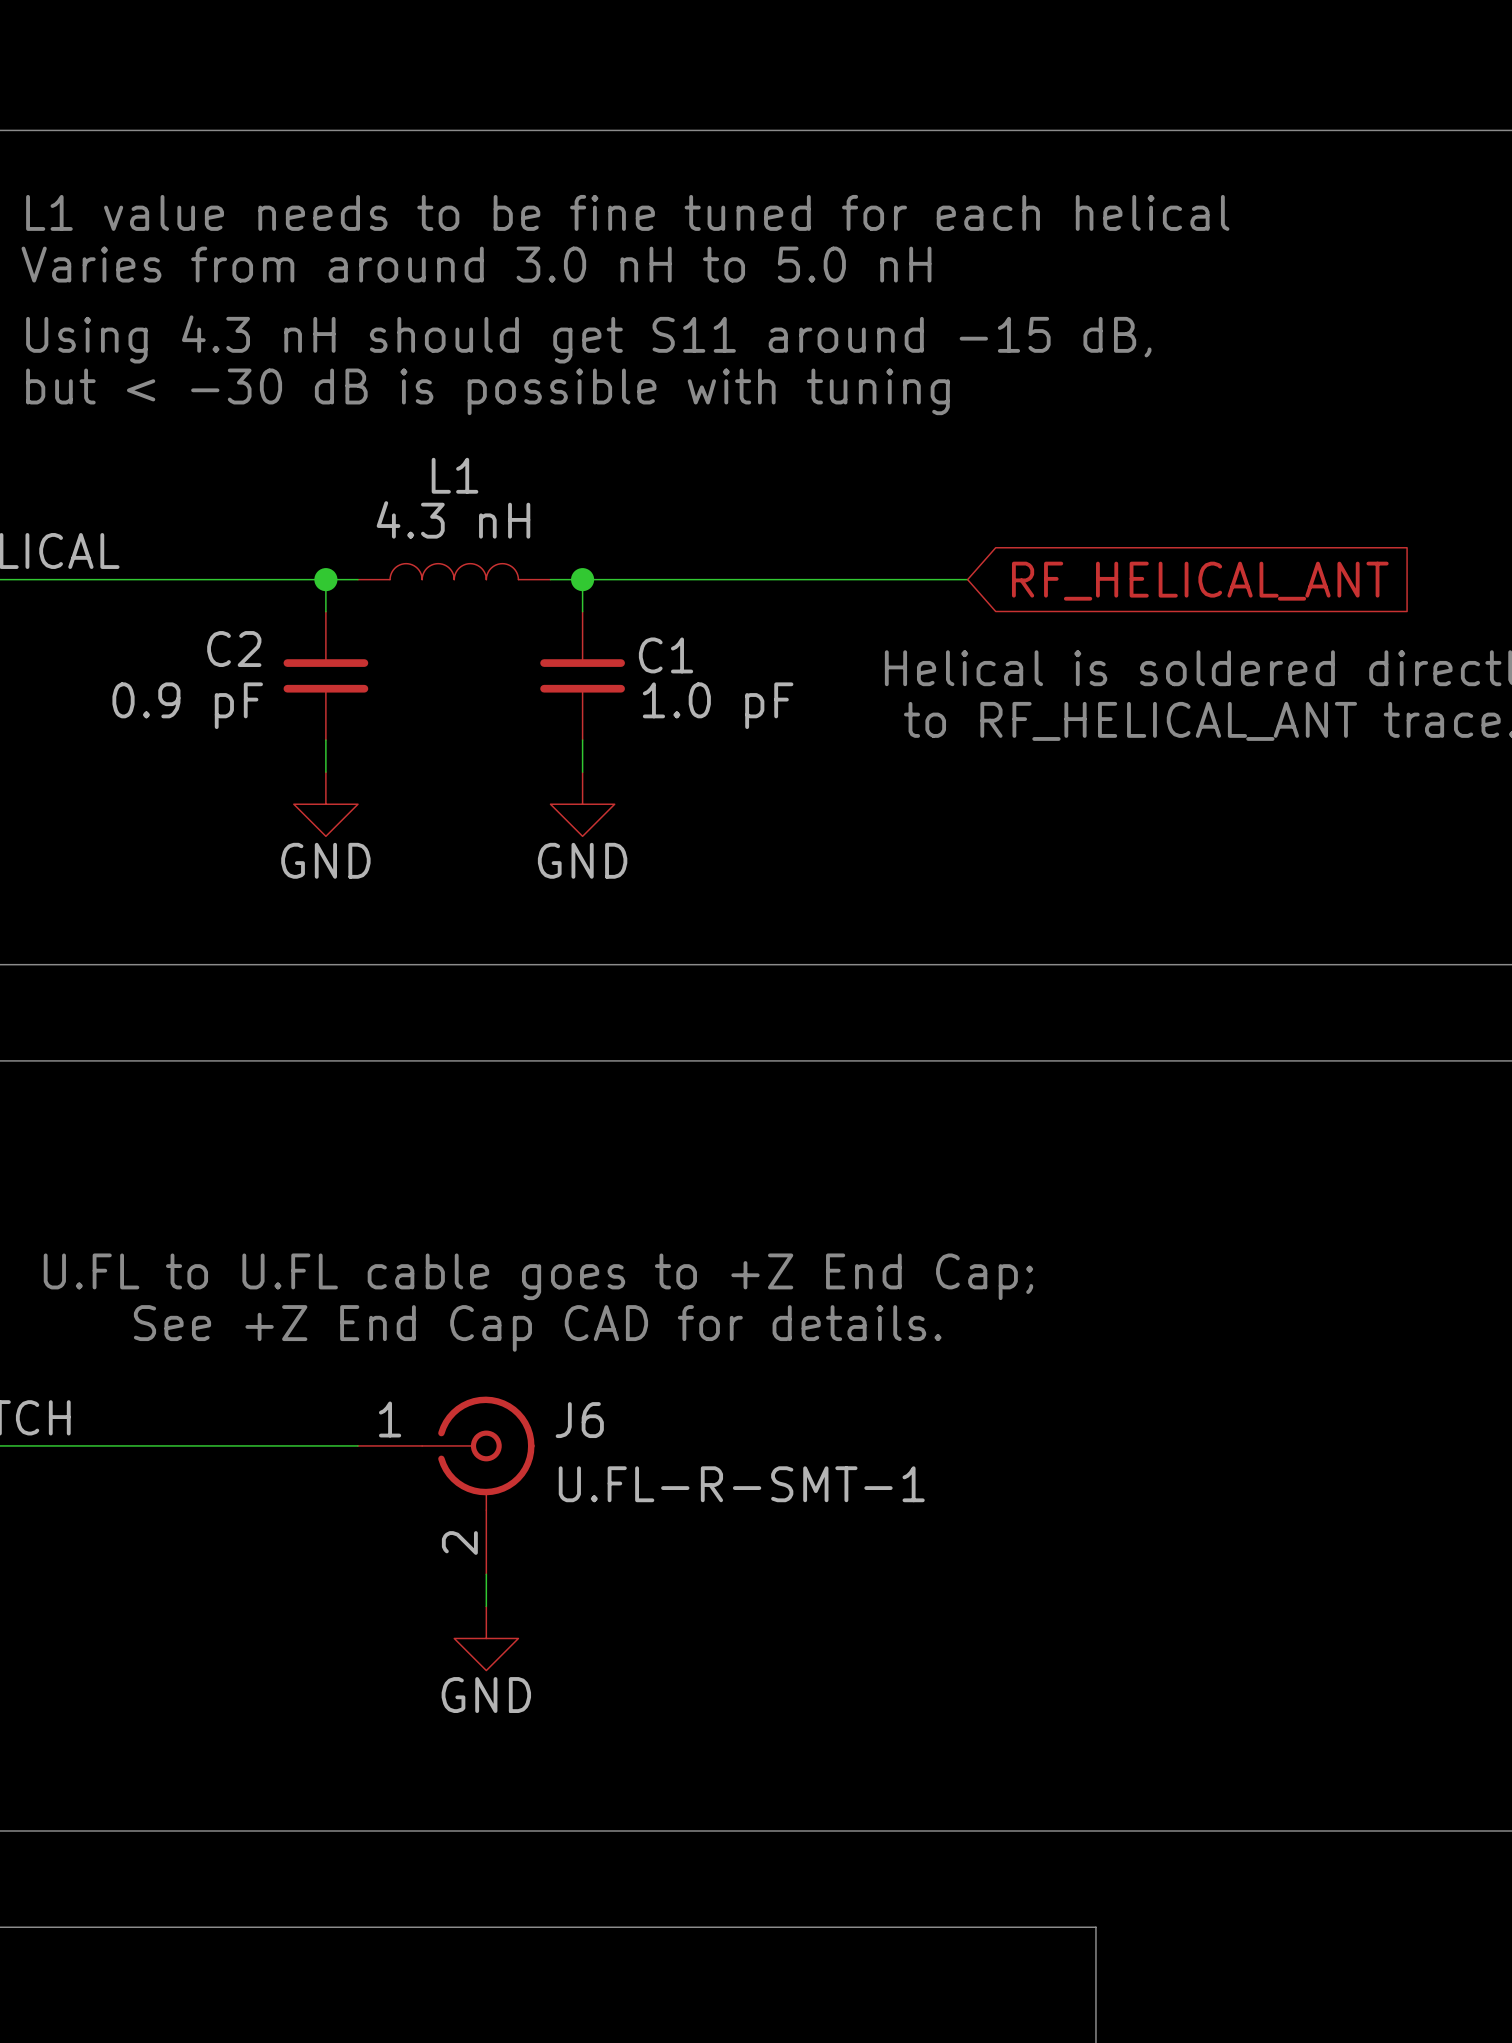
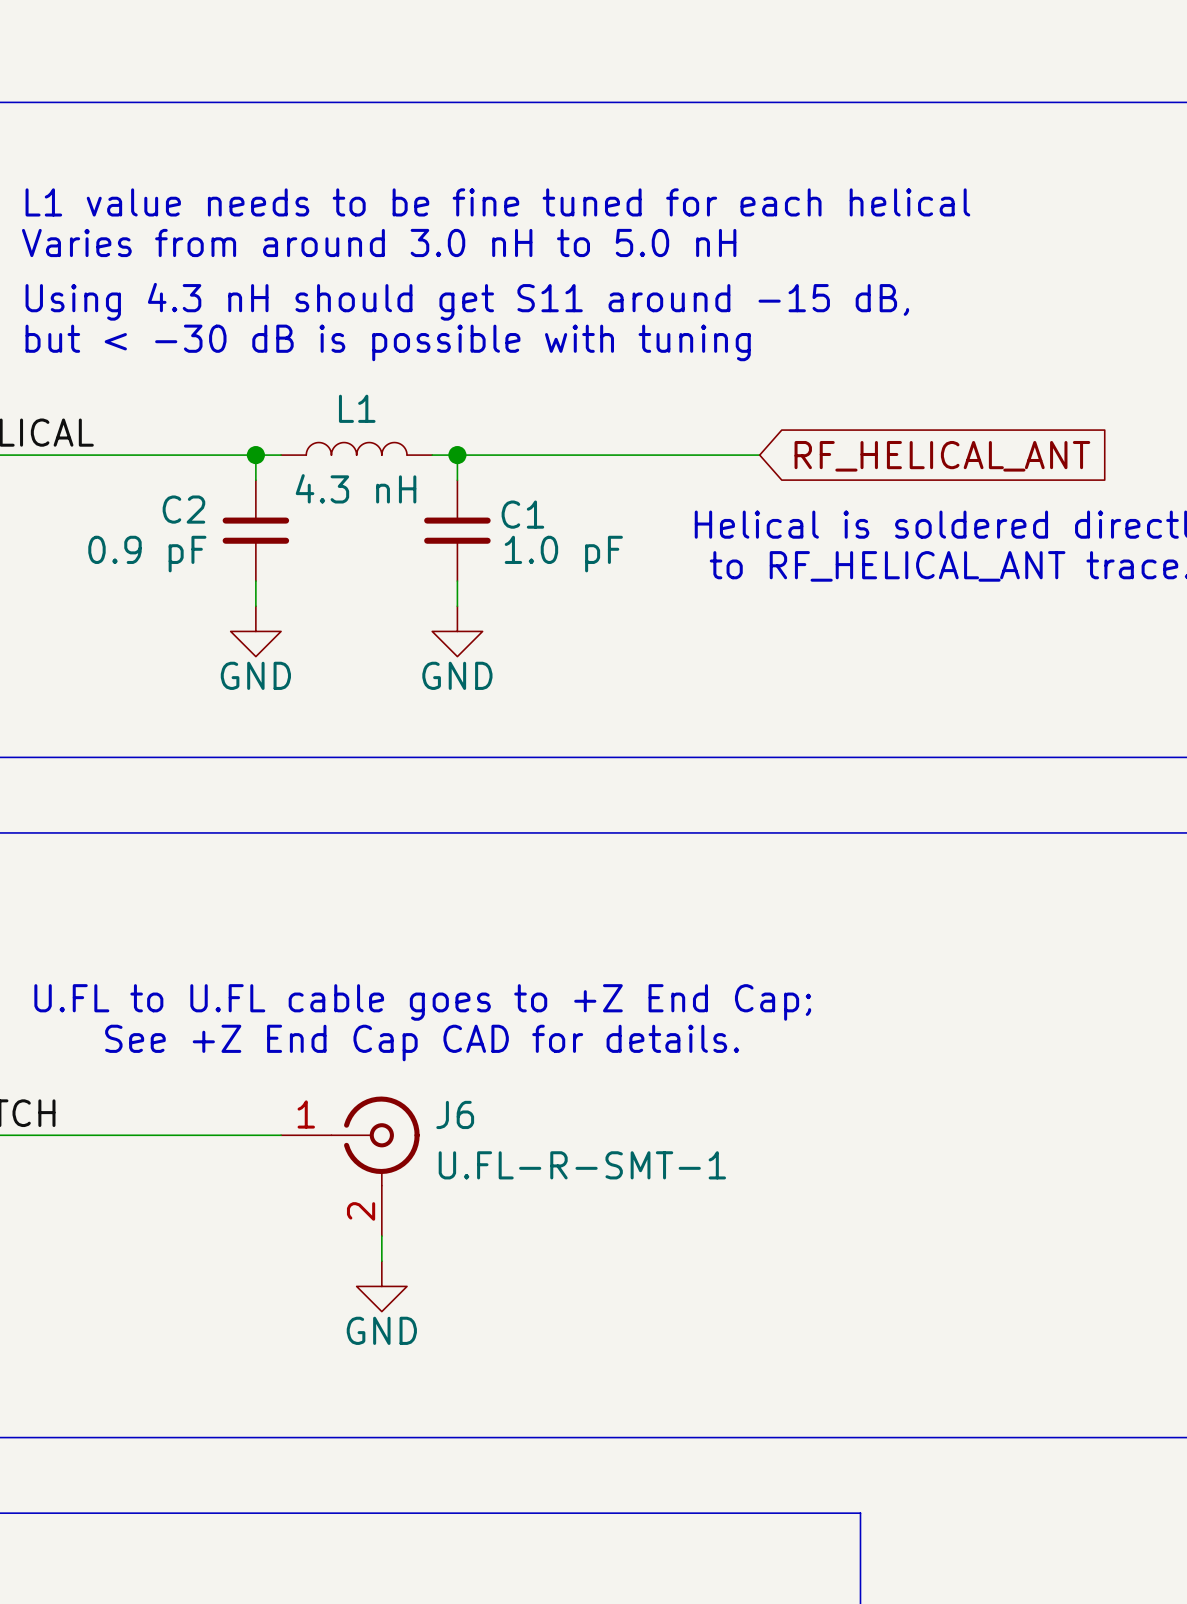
text: L1 value needs to be fine tuned for each helical (627, 212) -> none
text: Varies from around 3.0 nH to 5.0 nH (476, 264) -> L1 value needs to be fine tuned for each helical (497, 202)
text: none -> Varies from around 3.0 nH to 5.0 nH (379, 242)
text: Using 4.3 nH should get S11 around -15 dB, (588, 339) -> none
text: but < -30 dB is possible with tuning (487, 391) -> Using 4.3 nH should get S11 around -15 dB, (467, 301)
text: none -> but < -30 dB is possible with tuning (388, 342)
L1 name position: L1 (455, 475) -> L1 (357, 408)
L1 value position: 4.3 nH (453, 519) -> 4.3 nH (356, 488)

